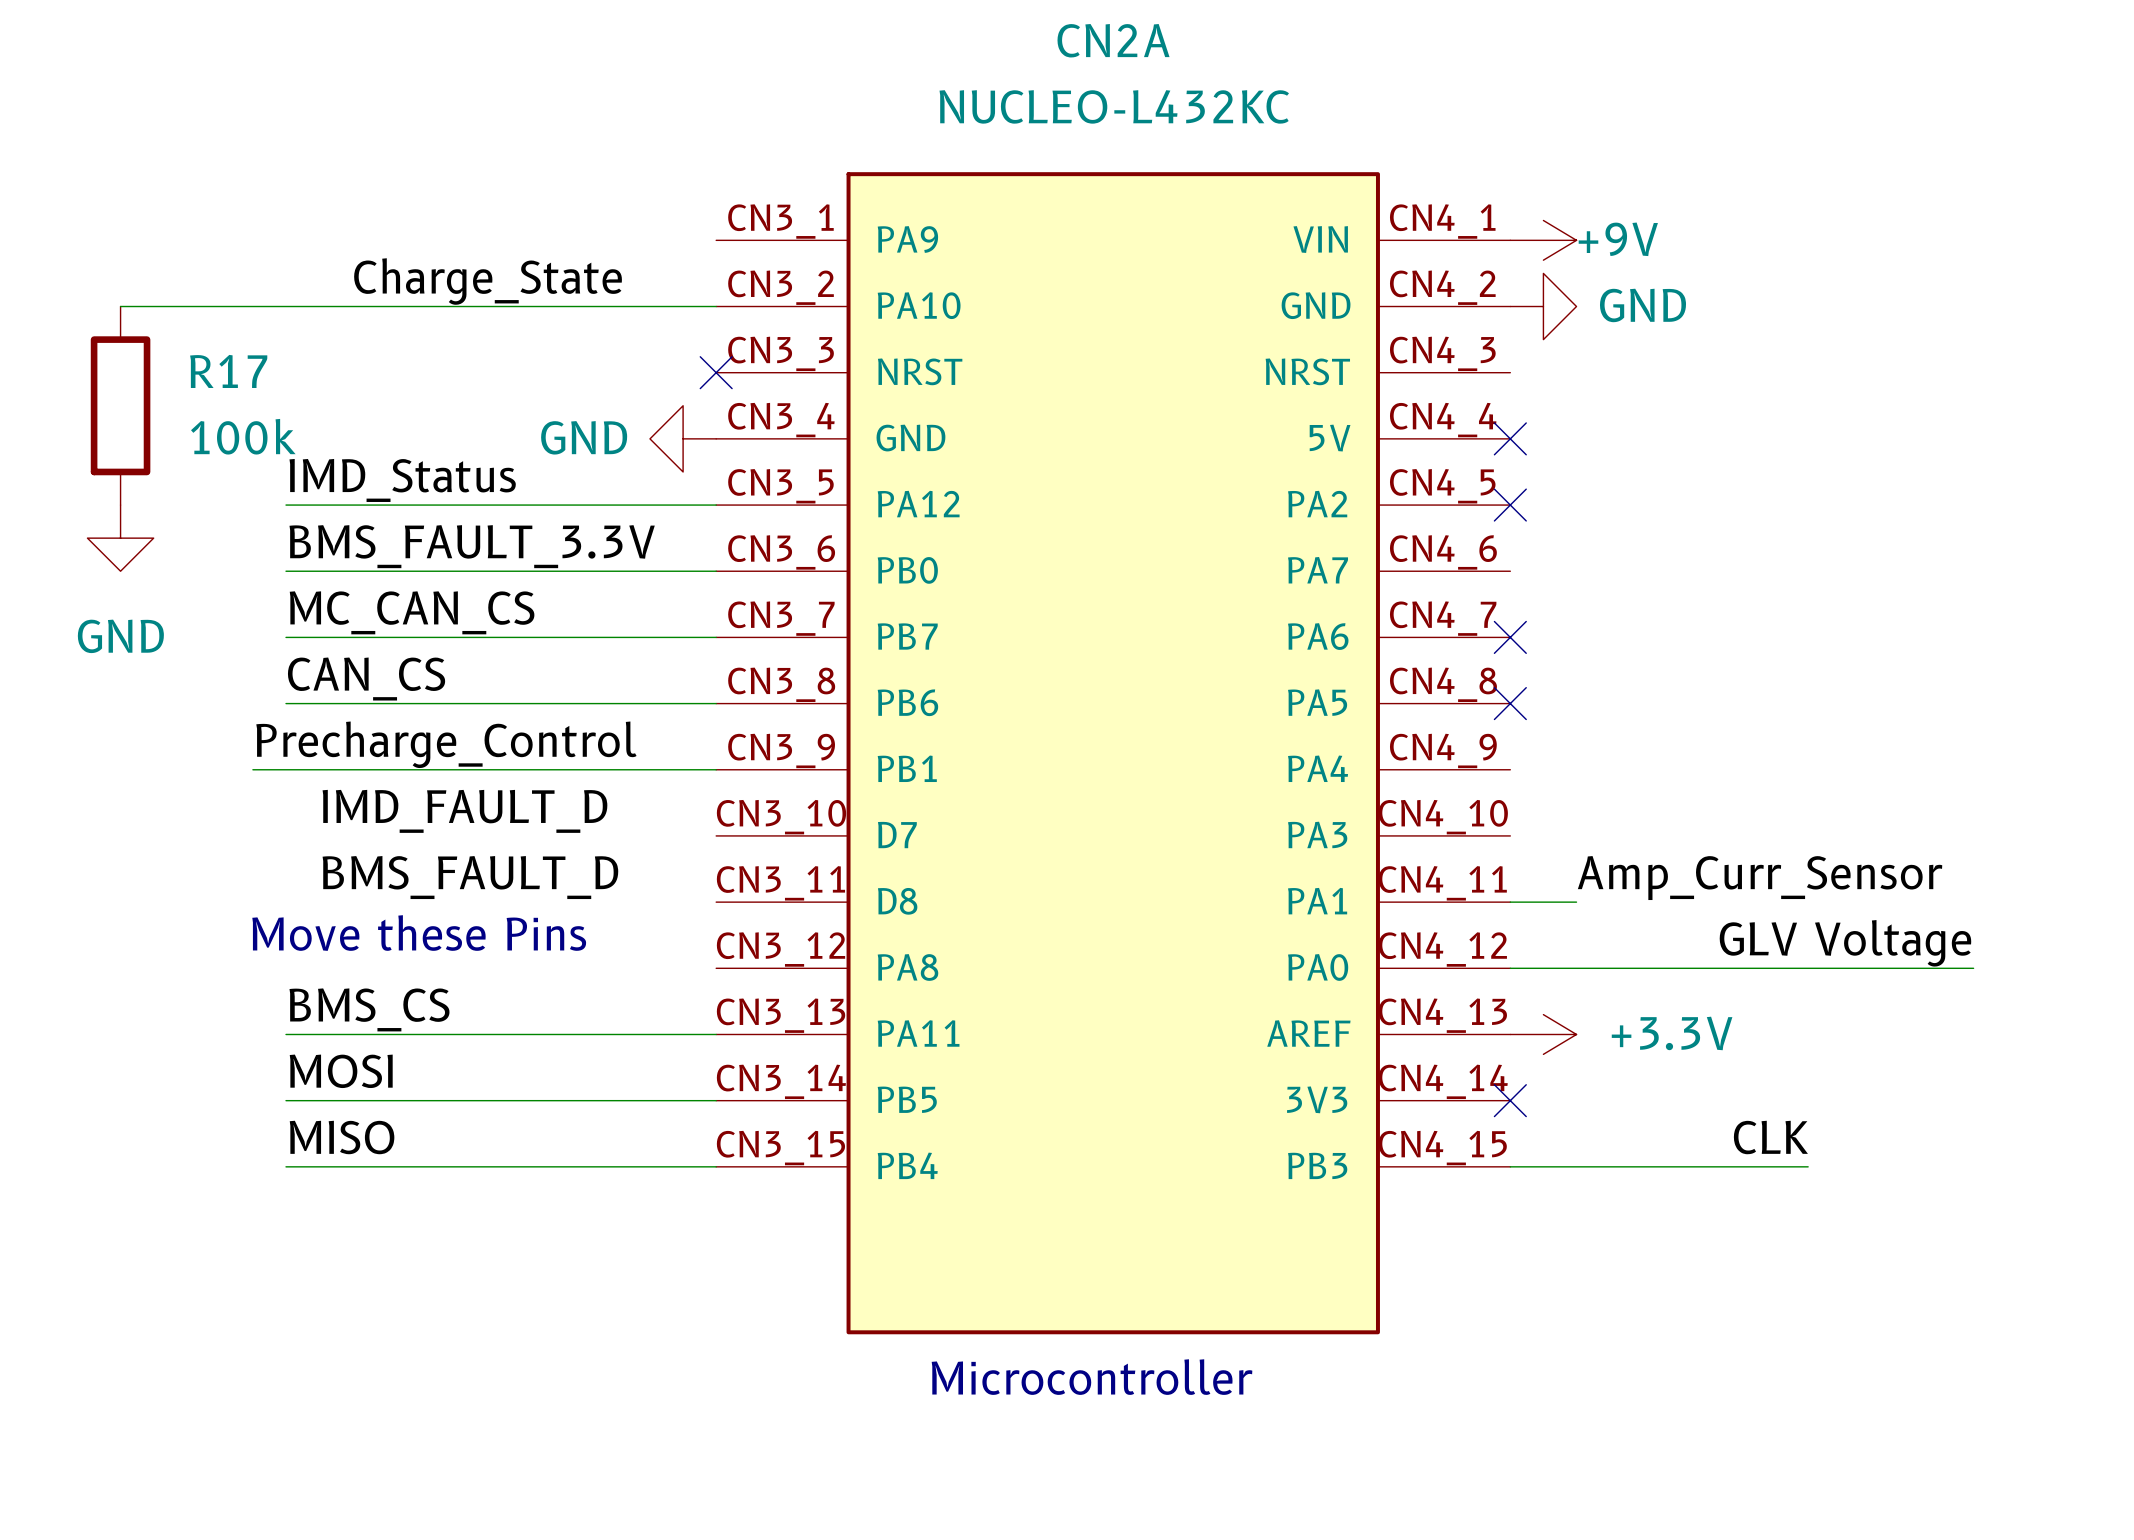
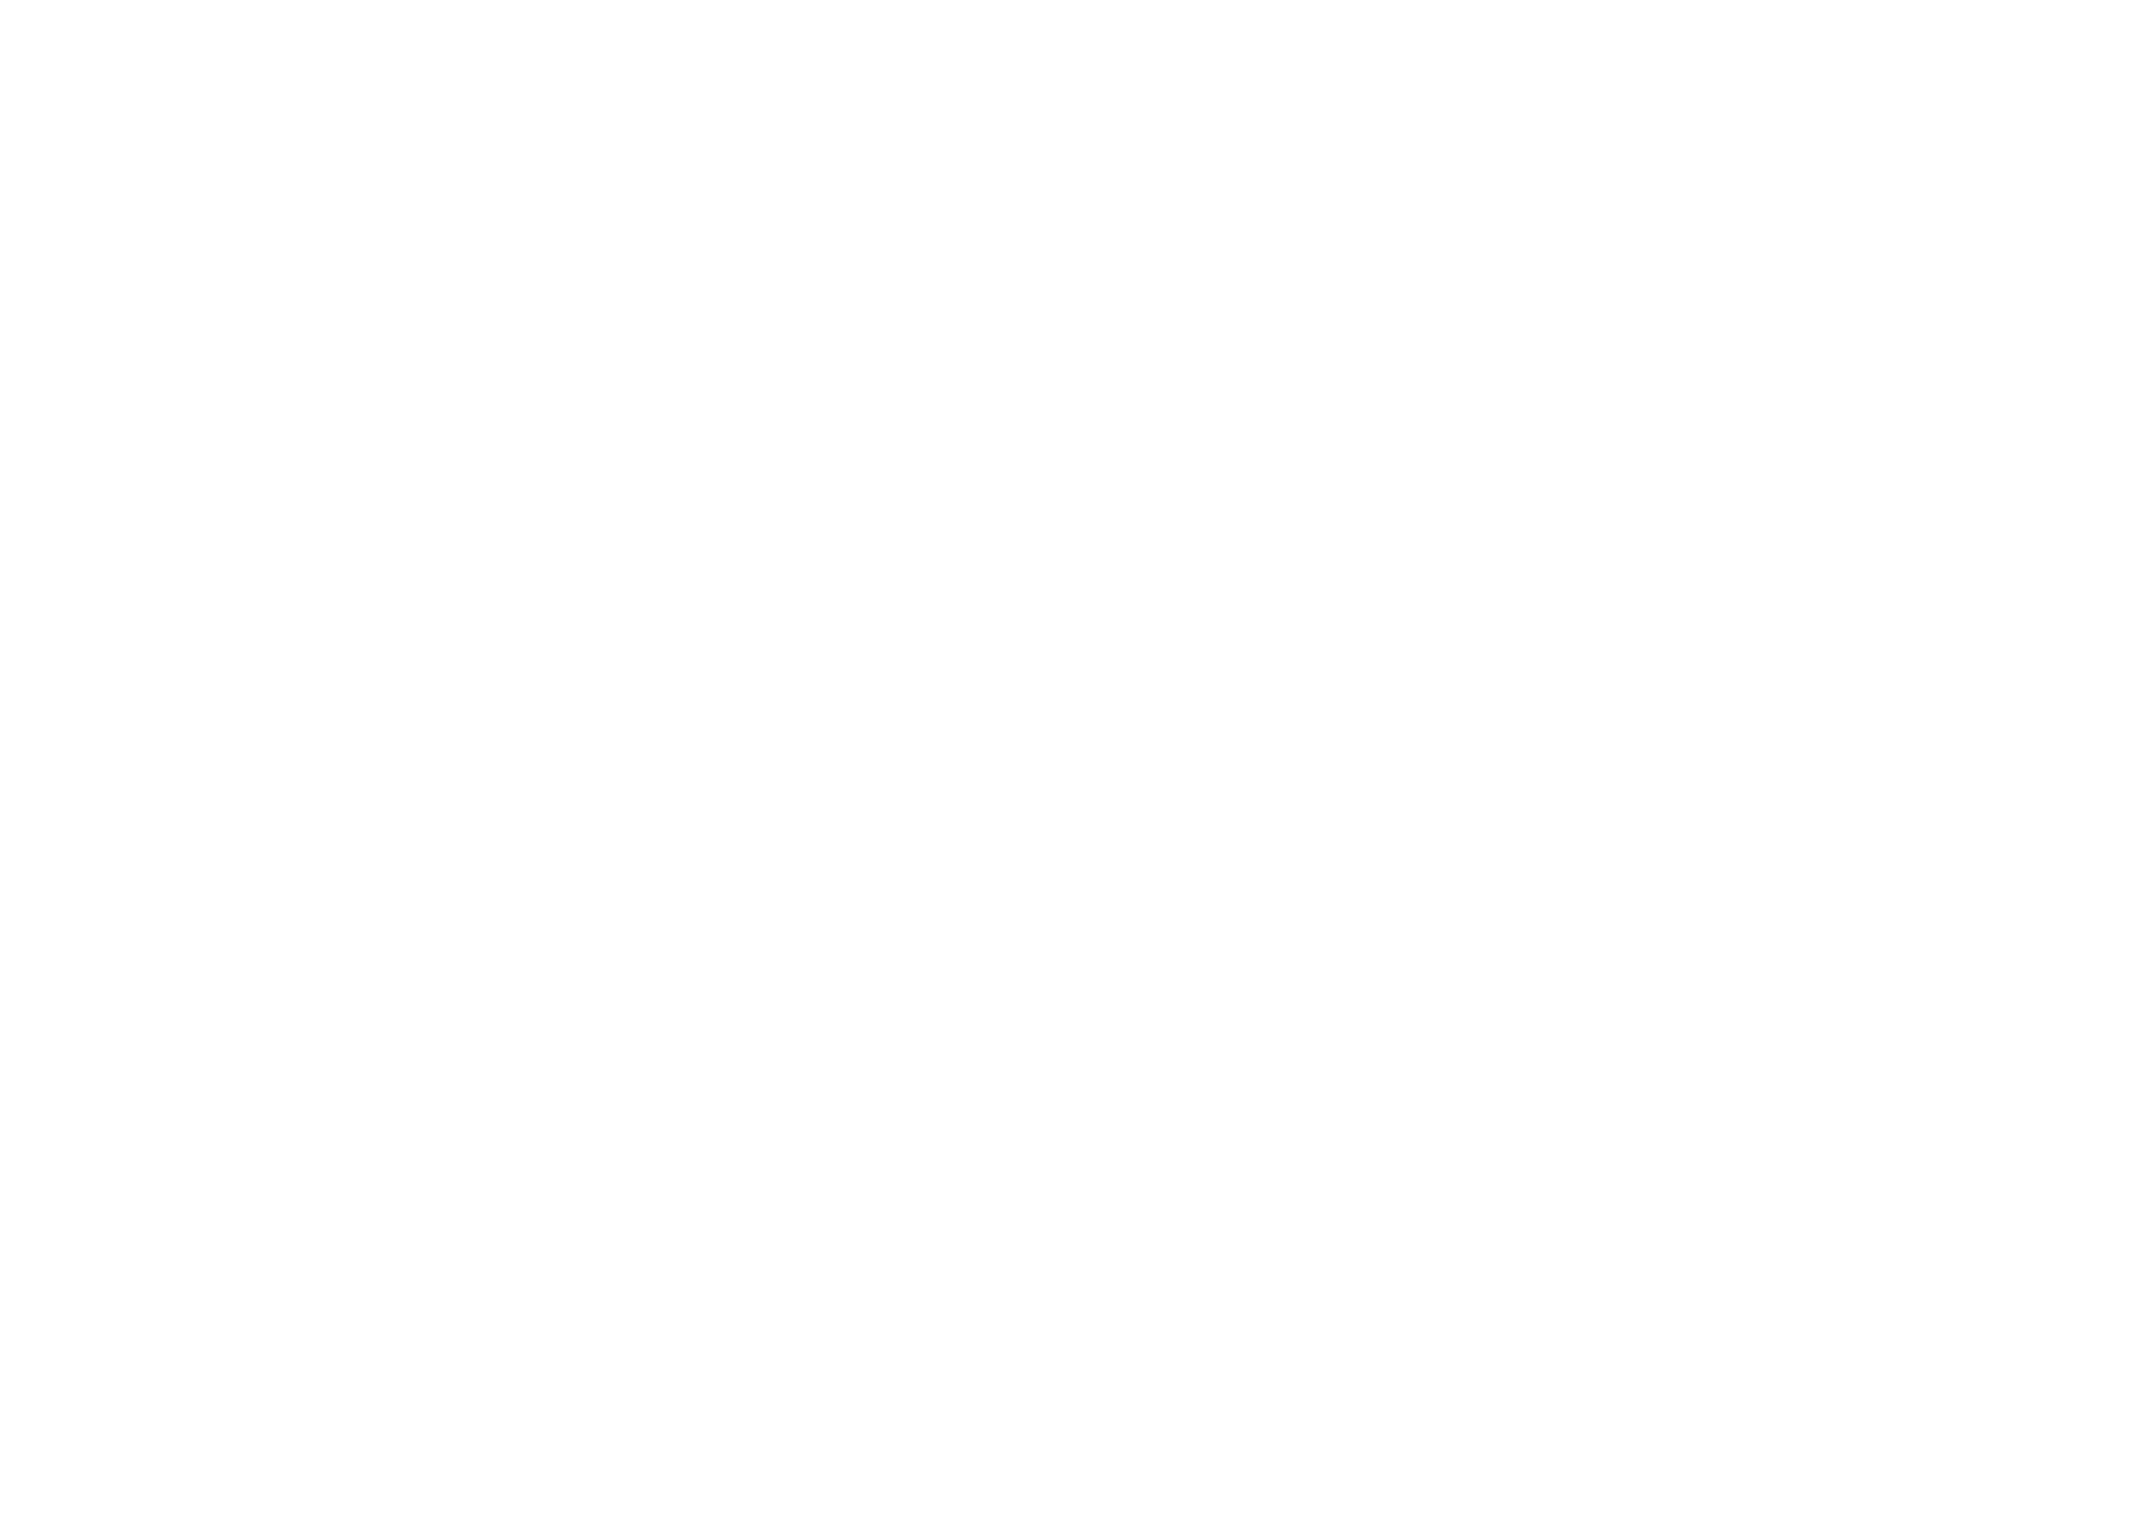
power symbol: +9V (1543, 240) -> none
label: Charge_State (488, 281) -> none
wire: (120, 306) (716, 306) -> none
power symbol: GND (1543, 306) -> none
no-connect mark: (716, 372) -> none
R17: 100k (120, 405) -> none
power symbol: GND (683, 438) -> none
no-connect mark: (1510, 438) -> none
label: IMD_Status (402, 480) -> none
wire: (286, 505) (716, 505) -> none
no-connect mark: (1510, 505) -> none
power symbol: GND (120, 538) -> none
label: BMS_FAULT_3.3V (472, 546) -> none
wire: (286, 571) (716, 571) -> none
label: MC_CAN_CS (412, 612) -> none
wire: (286, 637) (716, 637) -> none
no-connect mark: (1510, 637) -> none
label: CAN_CS (366, 679) -> none
wire: (286, 703) (716, 703) -> none
no-connect mark: (1510, 703) -> none
label: Precharge_Control (446, 744) -> none
CN2A: NUCLEO-L432KC (1113, 753) -> none
wire: (252, 769) (716, 769) -> none
label: IMD_FAULT_D (464, 811) -> none
label: BMS_FAULT_D (470, 877) -> none
label: Amp_Curr_Sensor (1760, 878) -> none
wire: (1510, 902) (1576, 902) -> none
text: Move these Pins (419, 933) -> none
label: GLV Voltage (1845, 943) -> none
wire: (1510, 968) (1973, 968) -> none
label: BMS_CS (369, 1009) -> none
wire: (286, 1034) (716, 1034) -> none
power symbol: +3.3V (1543, 1034) -> none
label: MOSI (341, 1071) -> none
wire: (286, 1100) (716, 1100) -> none
no-connect mark: (1510, 1100) -> none
label: MISO (342, 1137) -> none
label: CLK (1770, 1137) -> none
wire: (286, 1166) (716, 1166) -> none
wire: (1510, 1166) (1808, 1166) -> none
text: Microcontroller (1092, 1377) -> none

